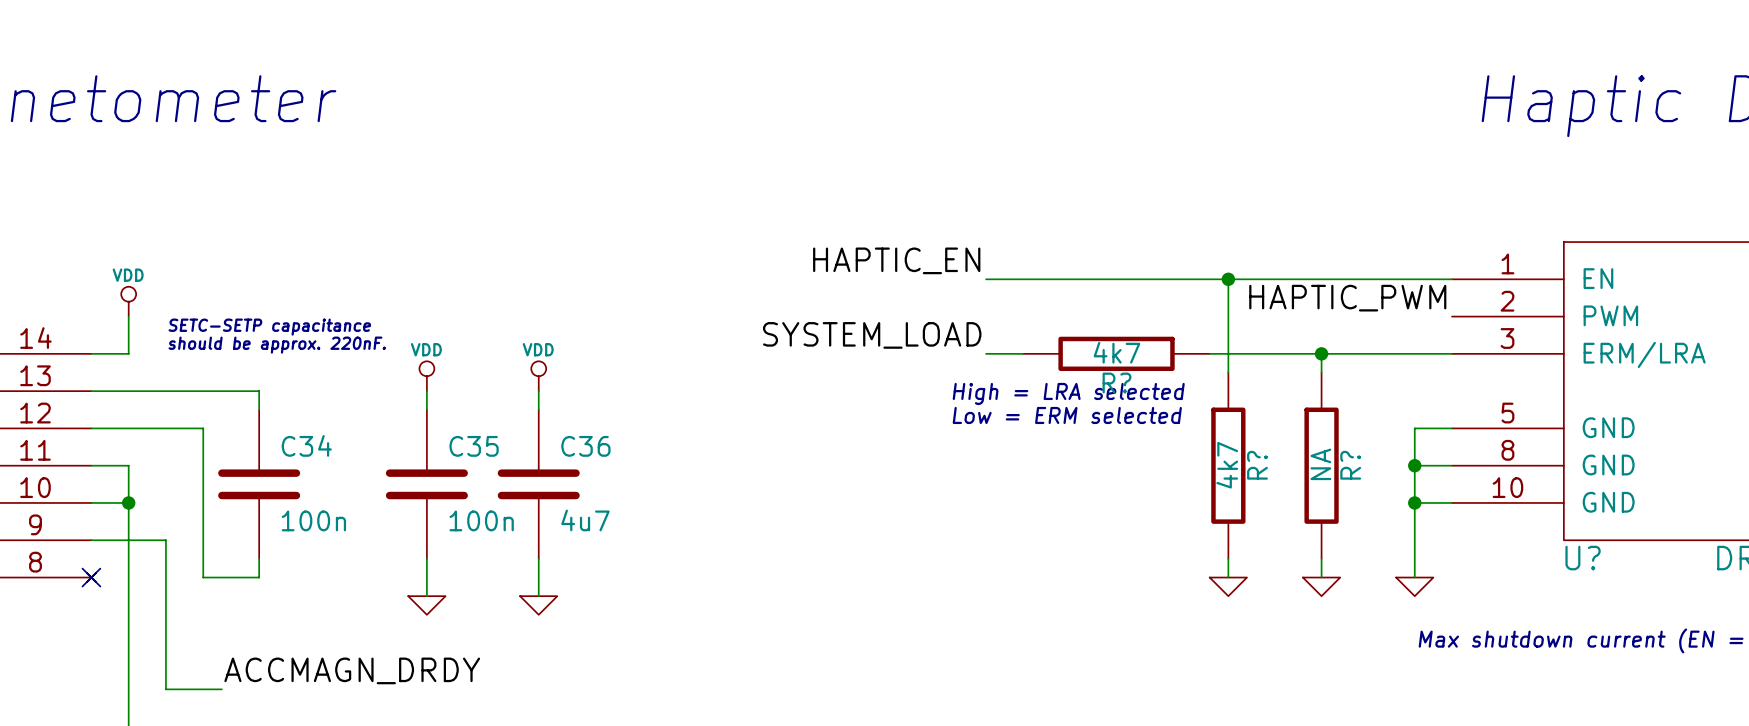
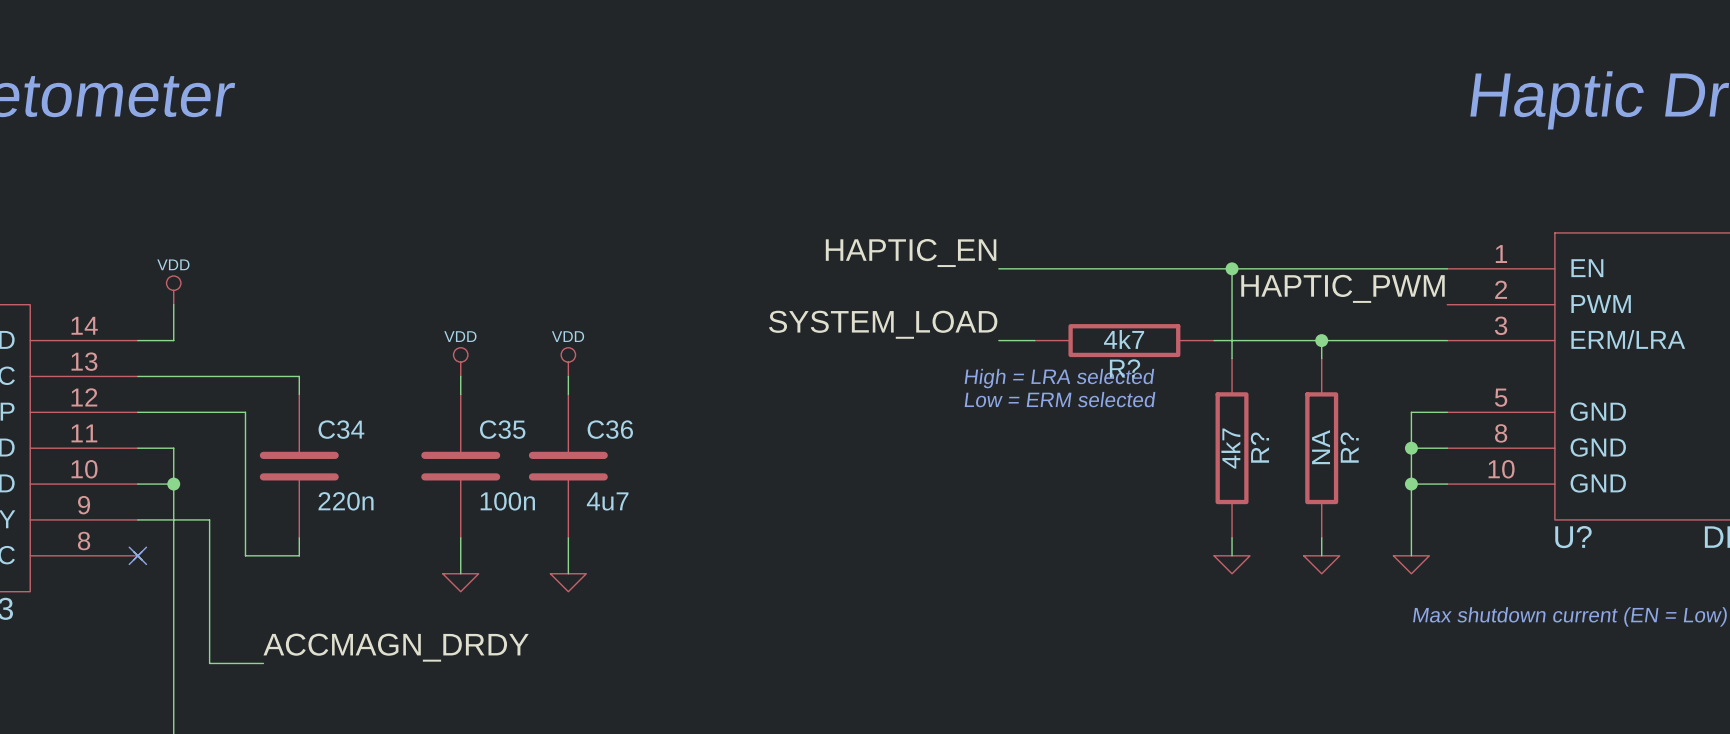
text: SETC-SETP capacitance (269, 327) -> none
text: should be approx. 220nF. (277, 345) -> none
C34 value: 100n (313, 520) -> 220n (346, 501)

